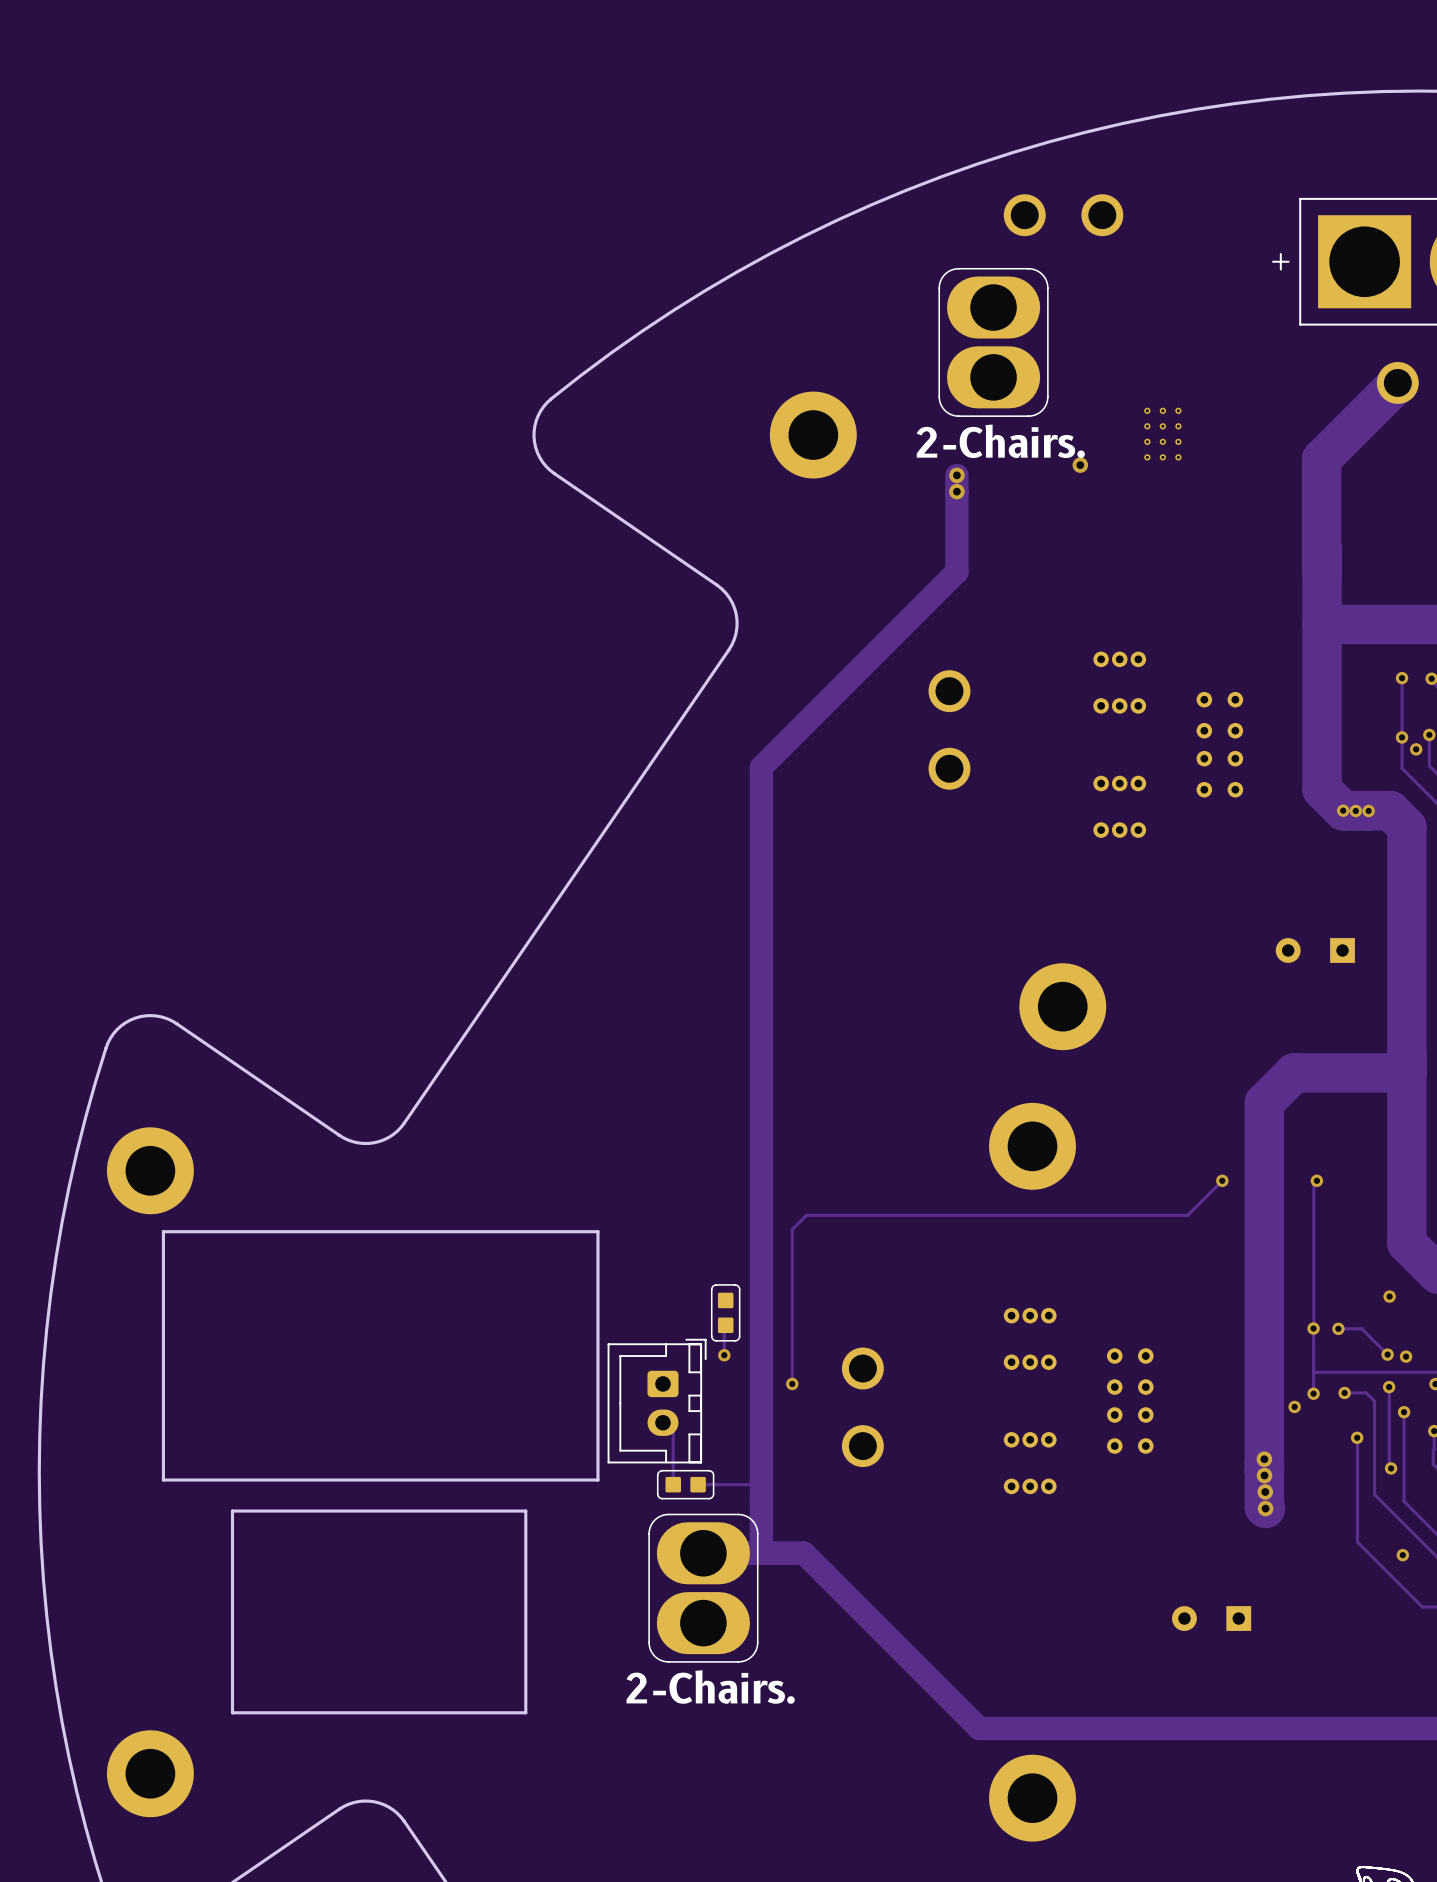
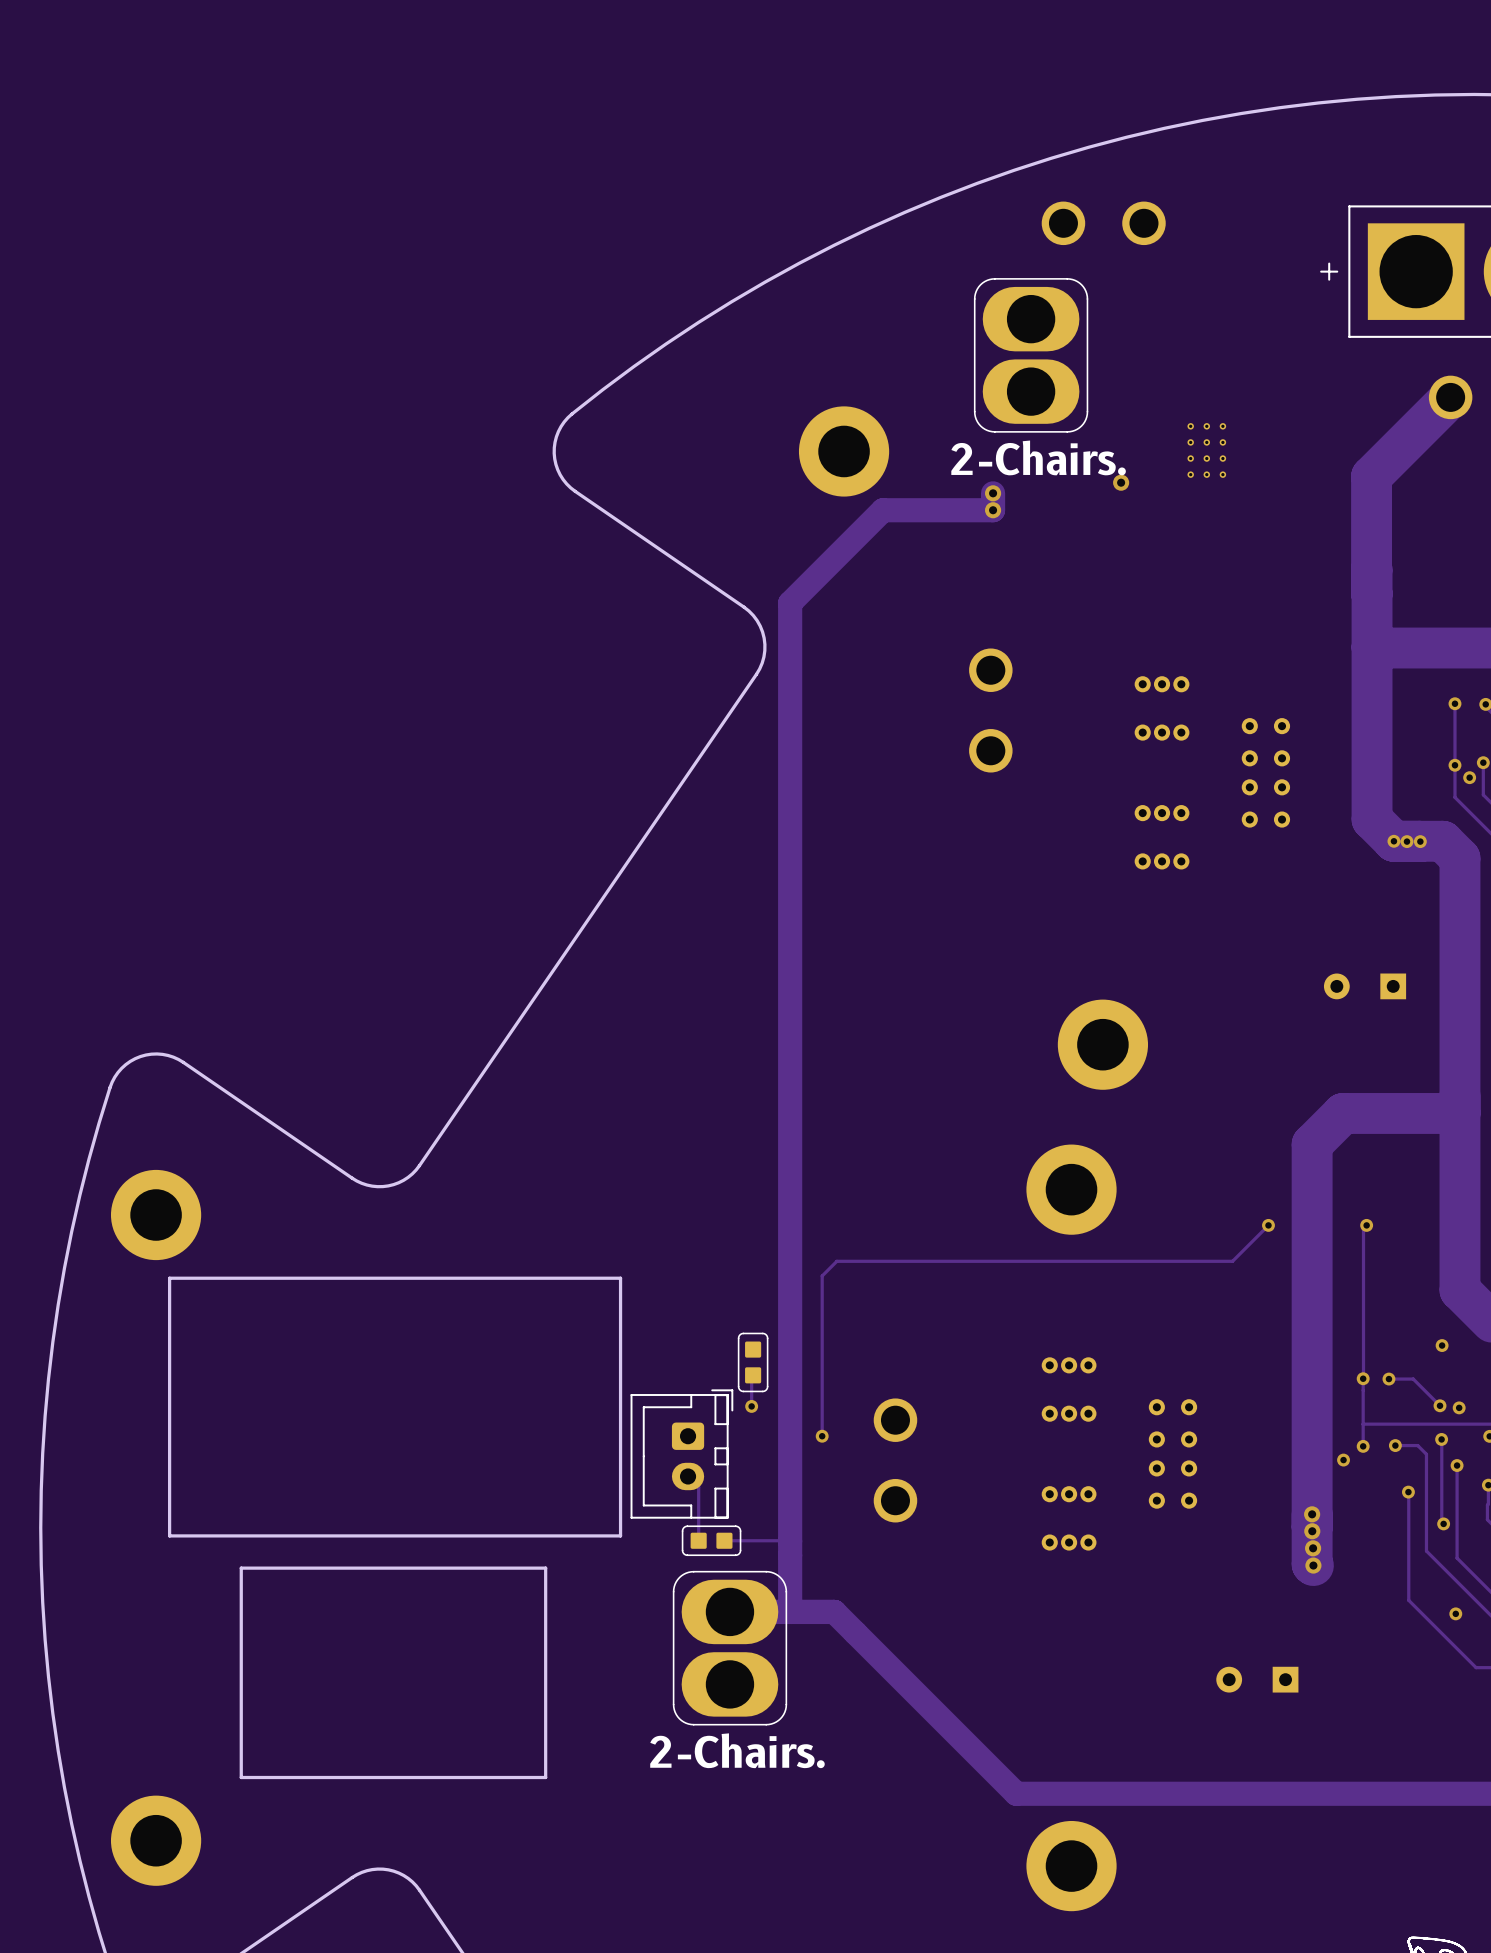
track: (956, 491) (956, 571) (761, 767) -> (993, 510) (882, 510) (790, 603) (790, 796)
part position: (949, 729) -> (990, 710)

